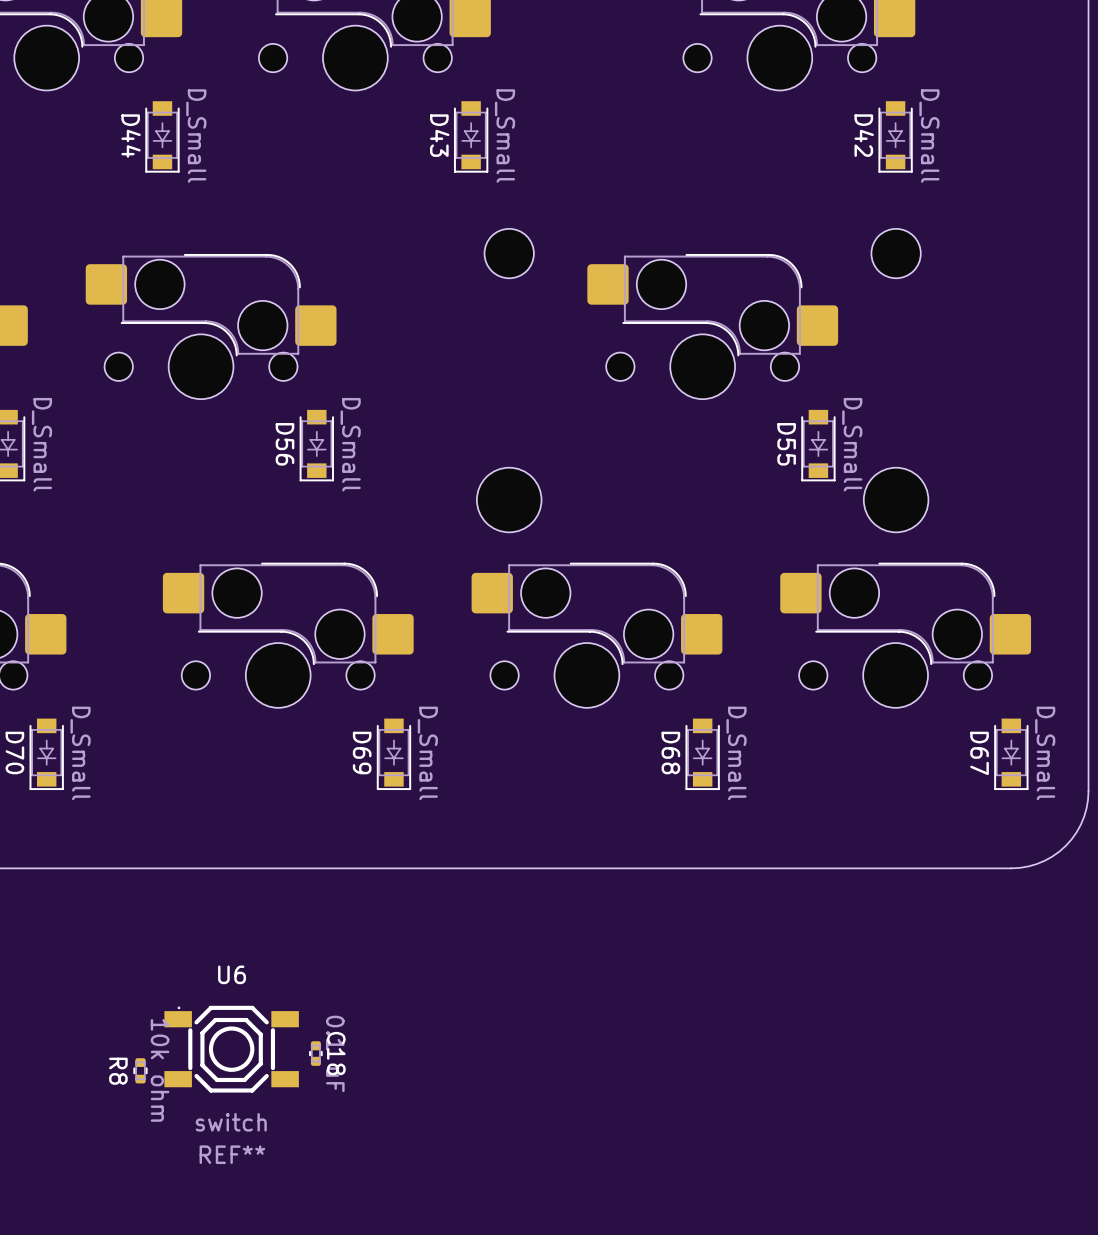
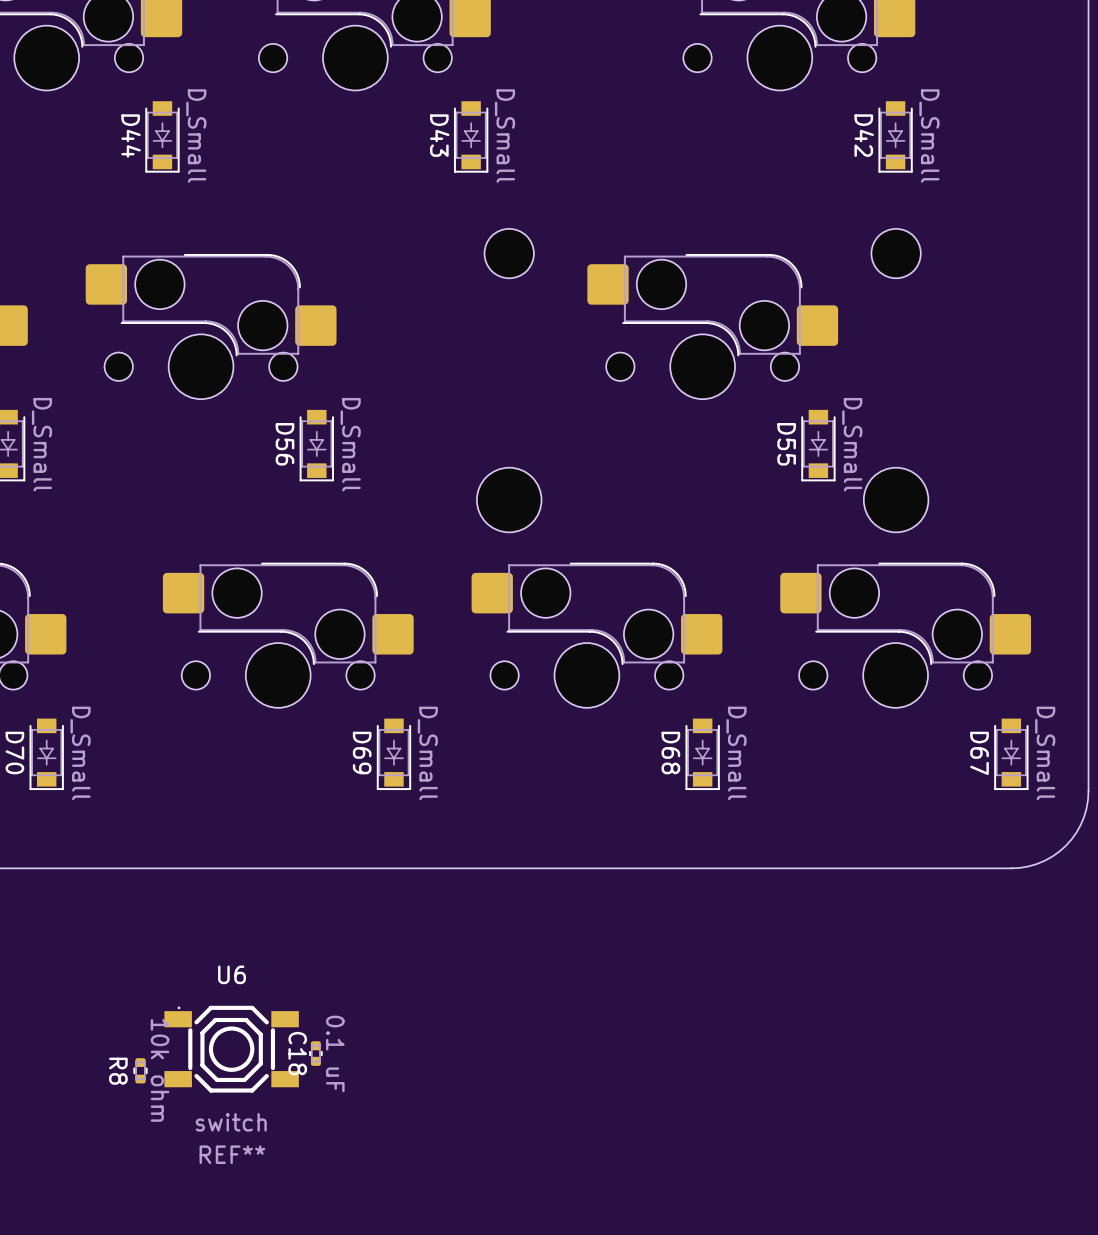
C18 name position: C18 (336, 1053) -> C18 (297, 1053)

